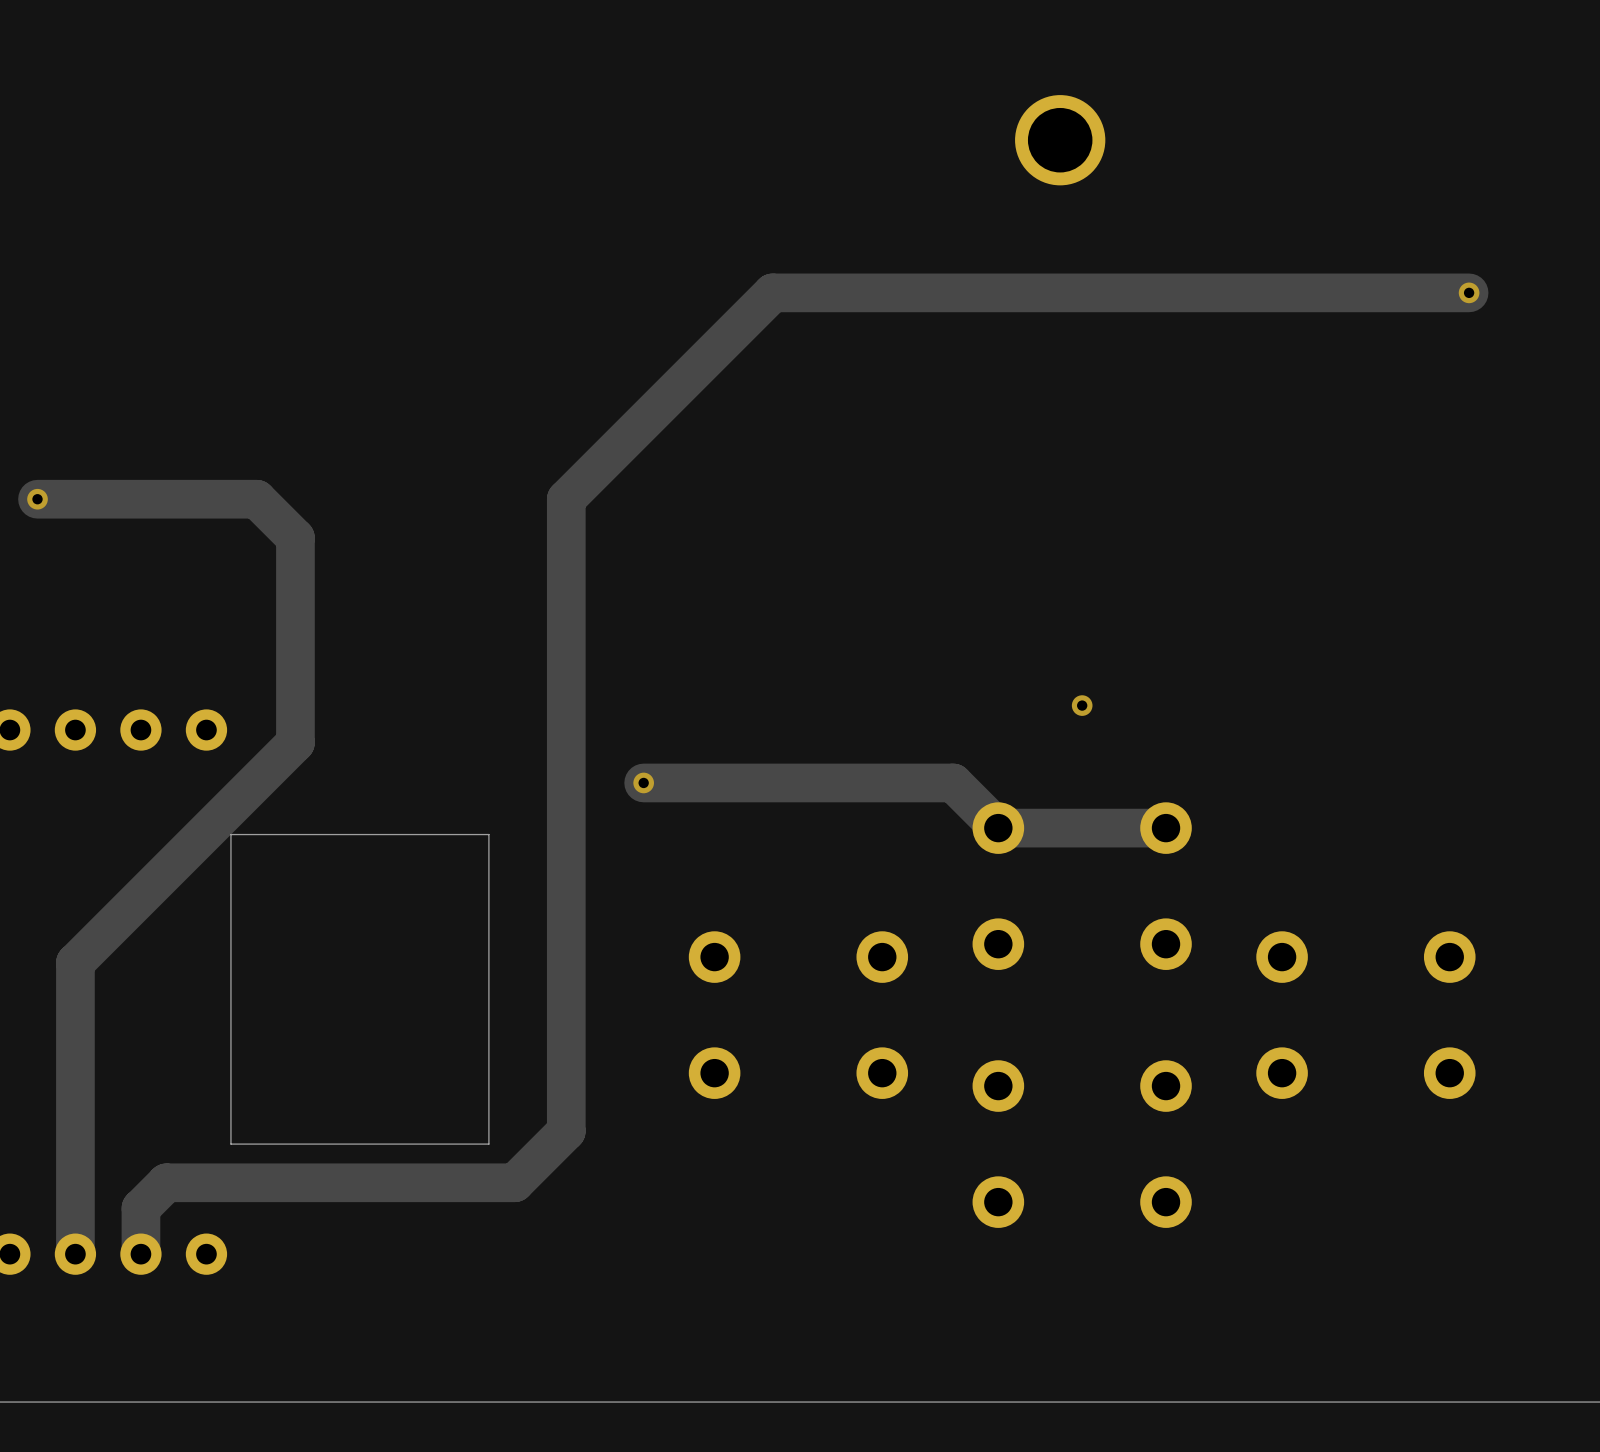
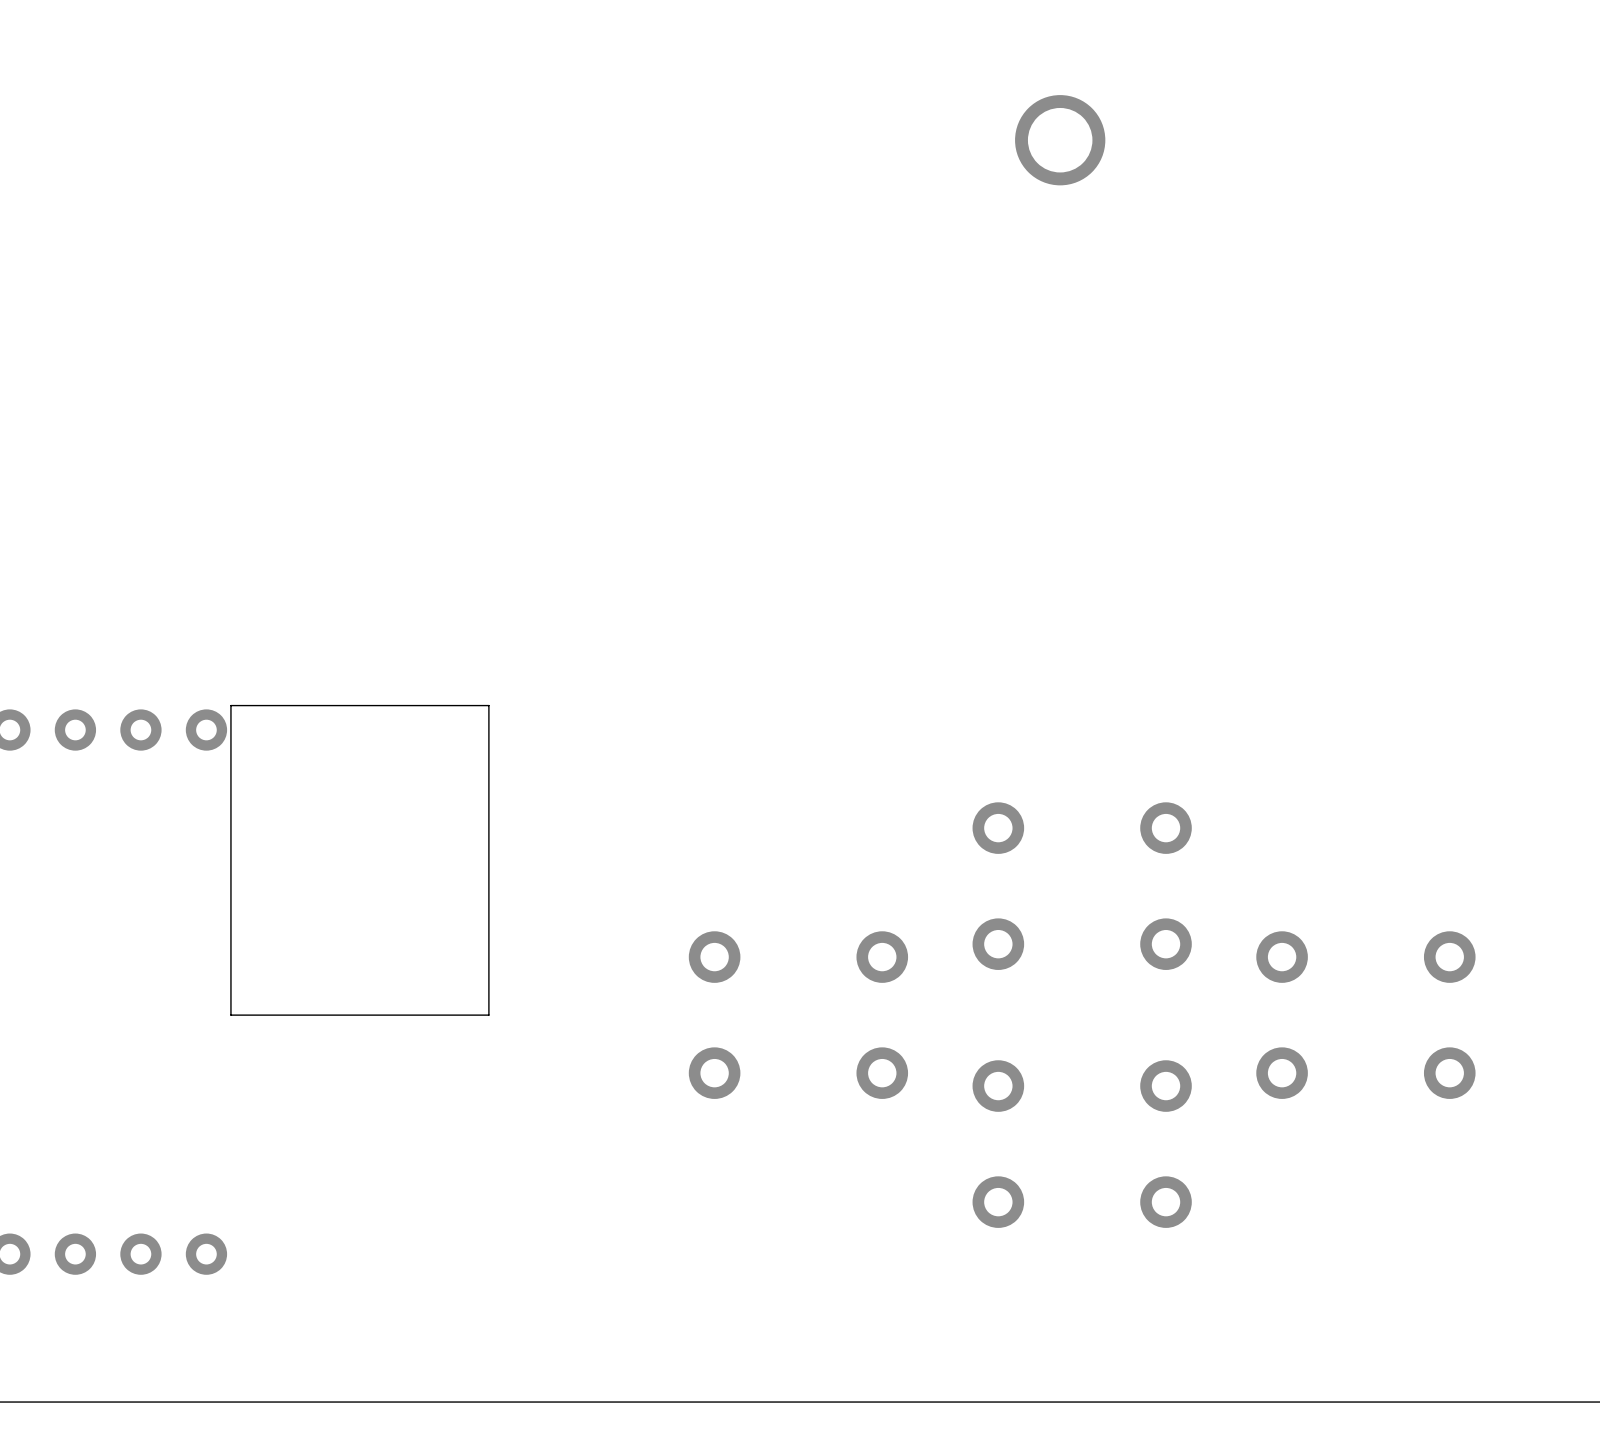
track: (1469, 292) (772, 292) (566, 499) (566, 1131) (514, 1182) (166, 1182) (140, 1208) (140, 1254) -> none
via: (1469, 292) -> none
track: (37, 499) (256, 499) (295, 537) (295, 742) (75, 962) (75, 1254) -> none
via: (37, 499) -> none
via: (1082, 705) -> none
track: (643, 782) (953, 782) (998, 828) (1166, 828) -> none
via: (643, 782) -> none
board edge: (488, 834) (230, 834) -> (488, 834) (488, 705) (230, 705) (230, 834)
board edge: (488, 1015) (488, 1144) (230, 1144) (230, 1015) -> (488, 1015) (230, 1015)

